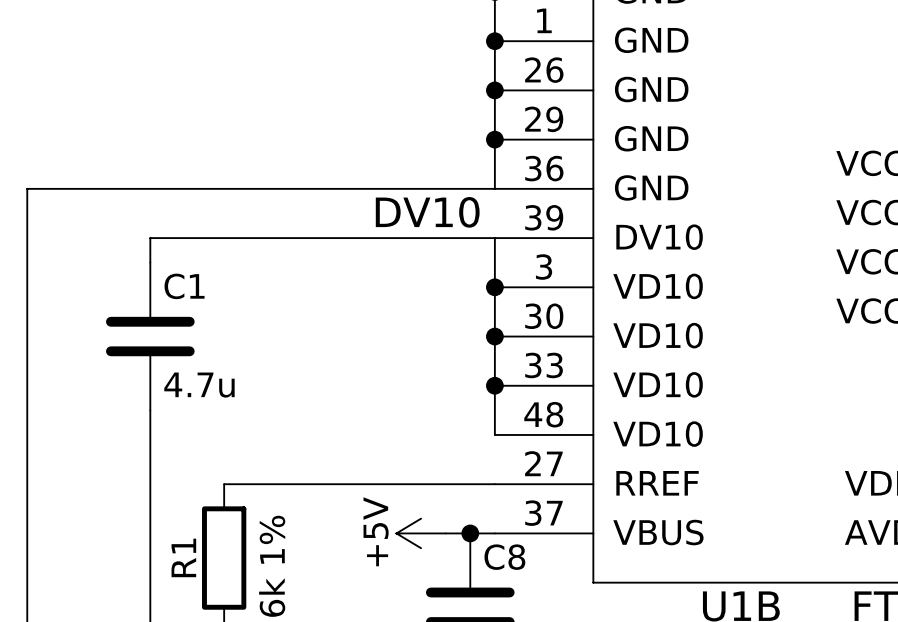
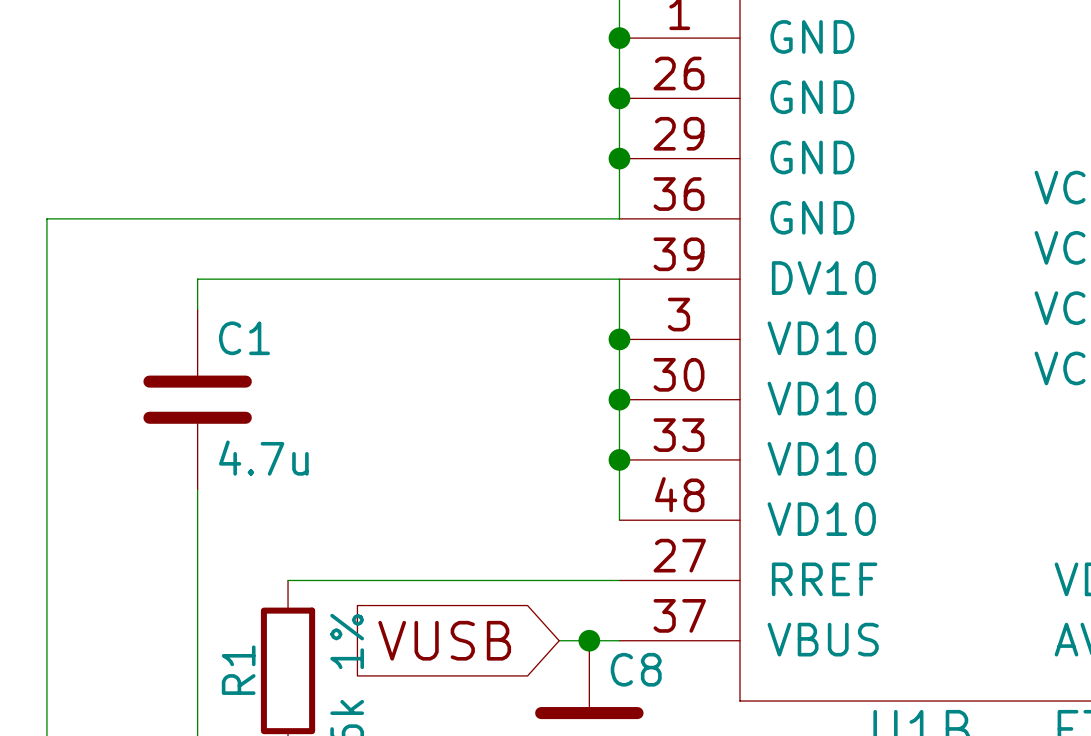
label: DV10 (427, 212) -> none
global label: none -> VUSB (444, 640)
power symbol: +5V (421, 533) -> none

